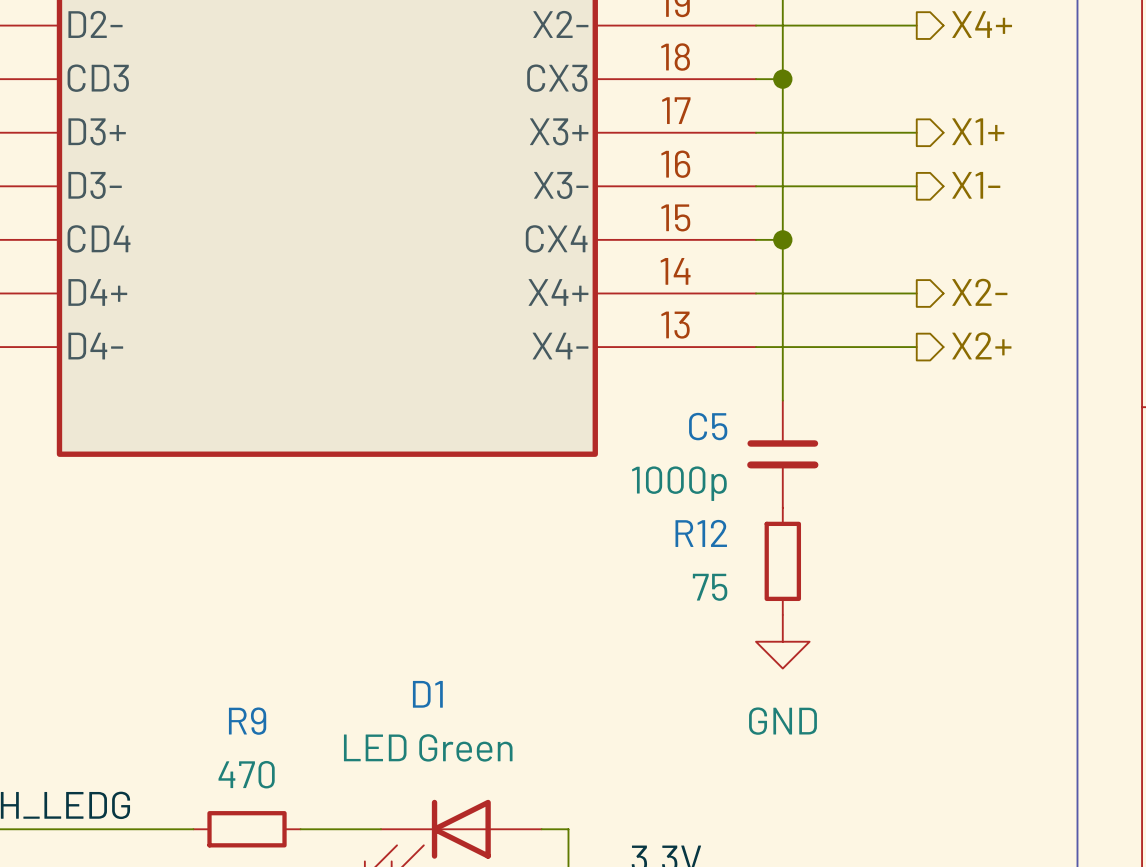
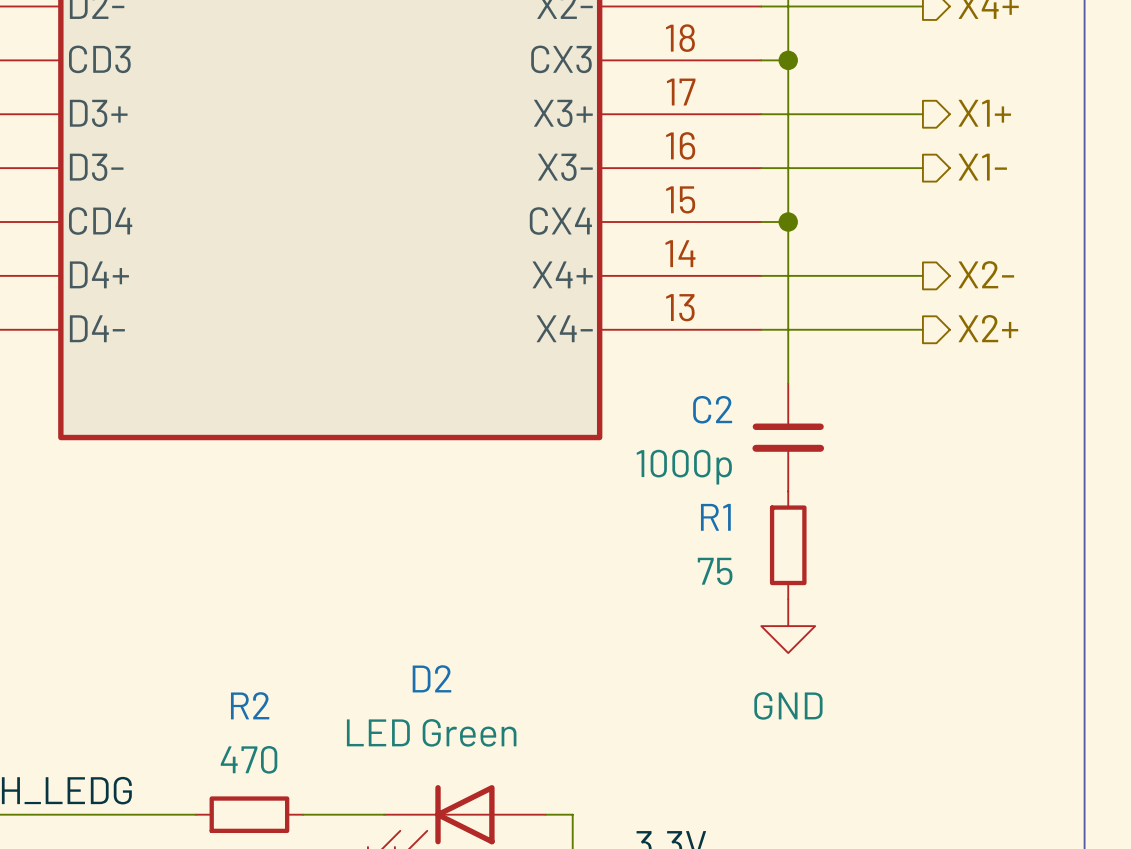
C5 name: C5 (708, 426) -> C2 (712, 409)
R12 name: R12 (701, 533) -> R1 (715, 517)
D1 name: D1 (427, 694) -> D2 (431, 678)
R9 name: R9 (247, 721) -> R2 (250, 705)

